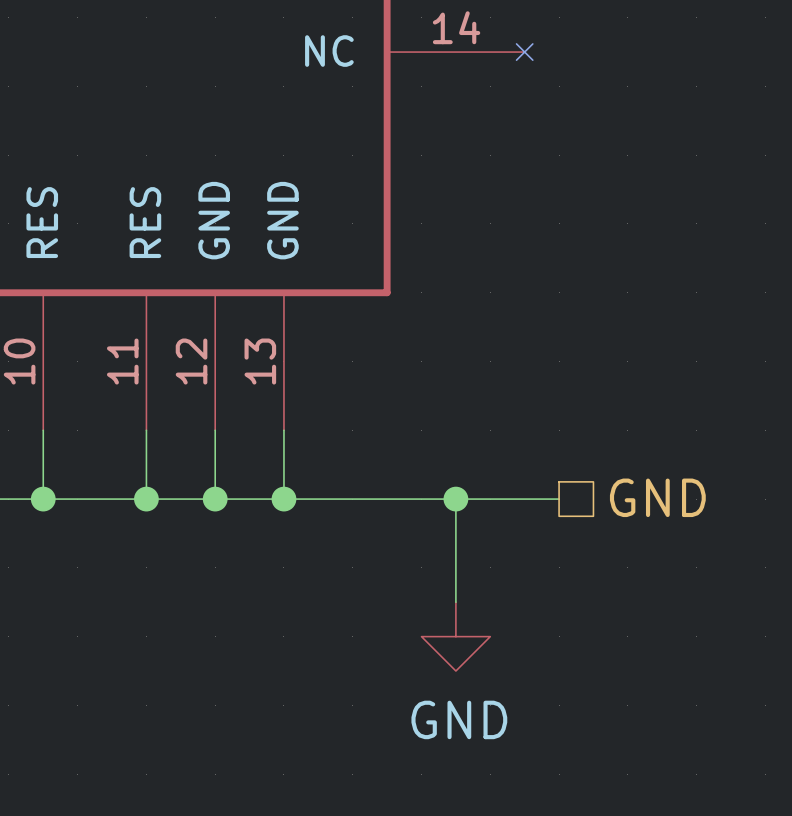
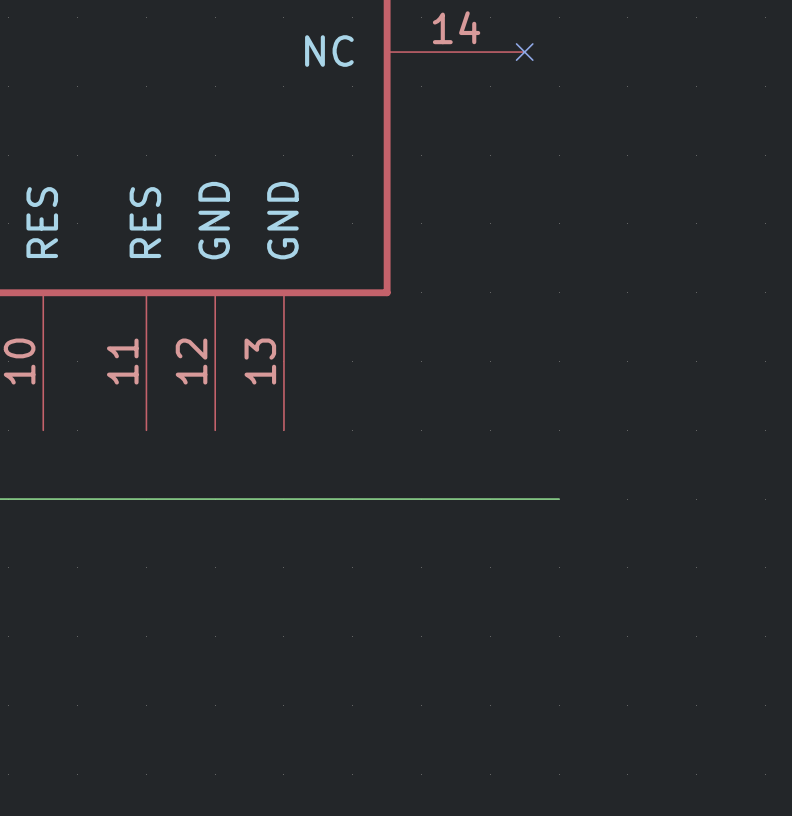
wire: (43, 430) (43, 499) -> none
wire: (146, 430) (146, 499) -> none
wire: (215, 430) (215, 499) -> none
wire: (283, 430) (283, 499) -> none
hierarchical label: GND (657, 497) -> none
junction: (43, 499) -> none
junction: (146, 499) -> none
junction: (215, 499) -> none
junction: (283, 499) -> none
wire: (455, 499) (455, 602) -> none
junction: (455, 499) -> none
power symbol: GND (455, 636) -> none

